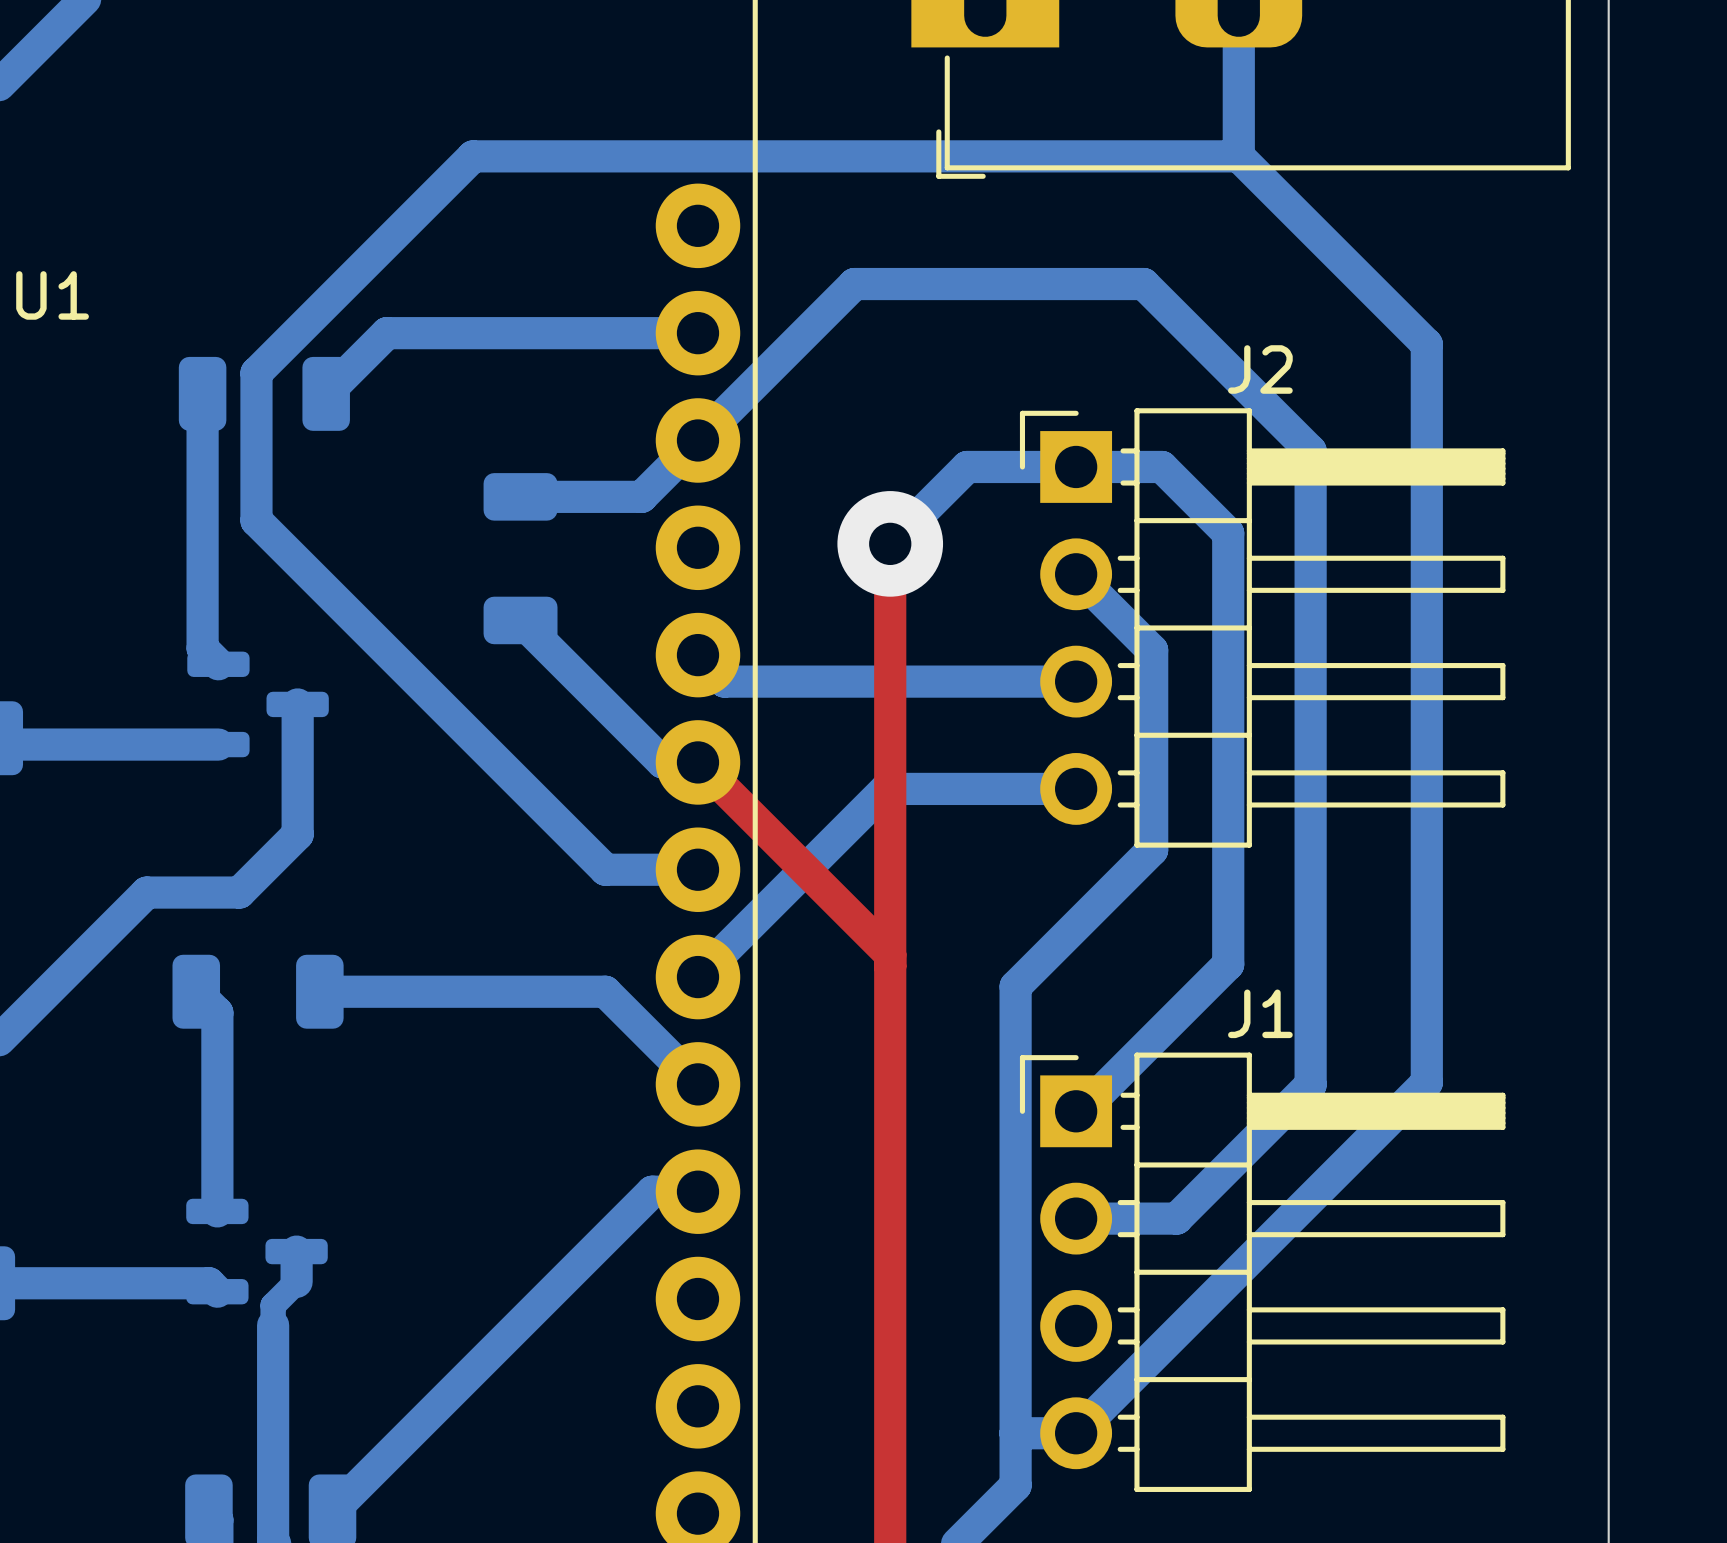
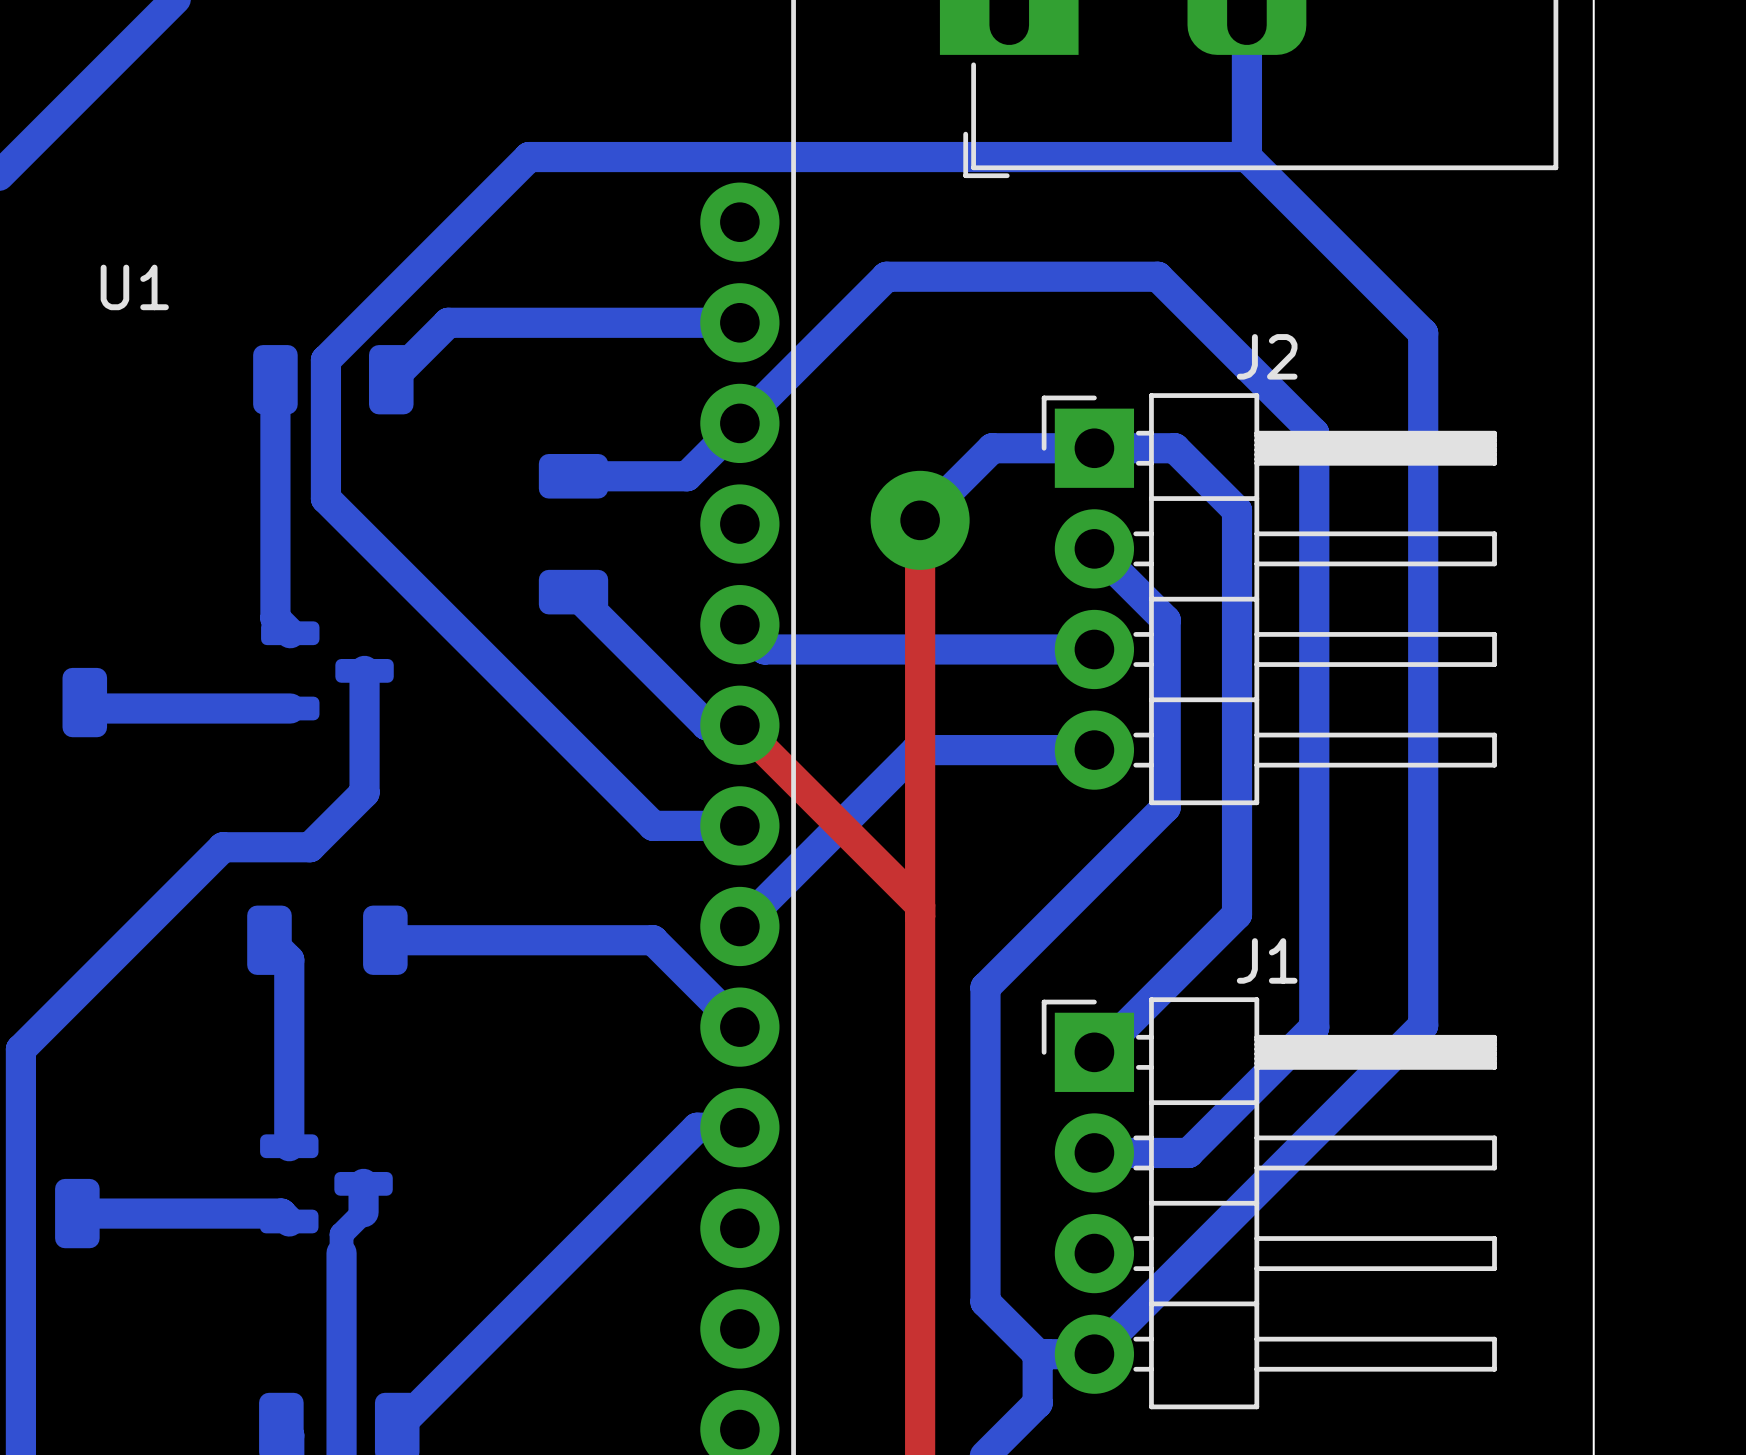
J2 footprint: [1019, 408, 1506, 848] -> [1041, 393, 1497, 806]
bottom track: (1015, 986) (1015, 1433) -> (1037, 935) (985, 987) (985, 1302) (1037, 1354)
J1 footprint: [1019, 1052, 1506, 1492] -> [1041, 997, 1497, 1410]

